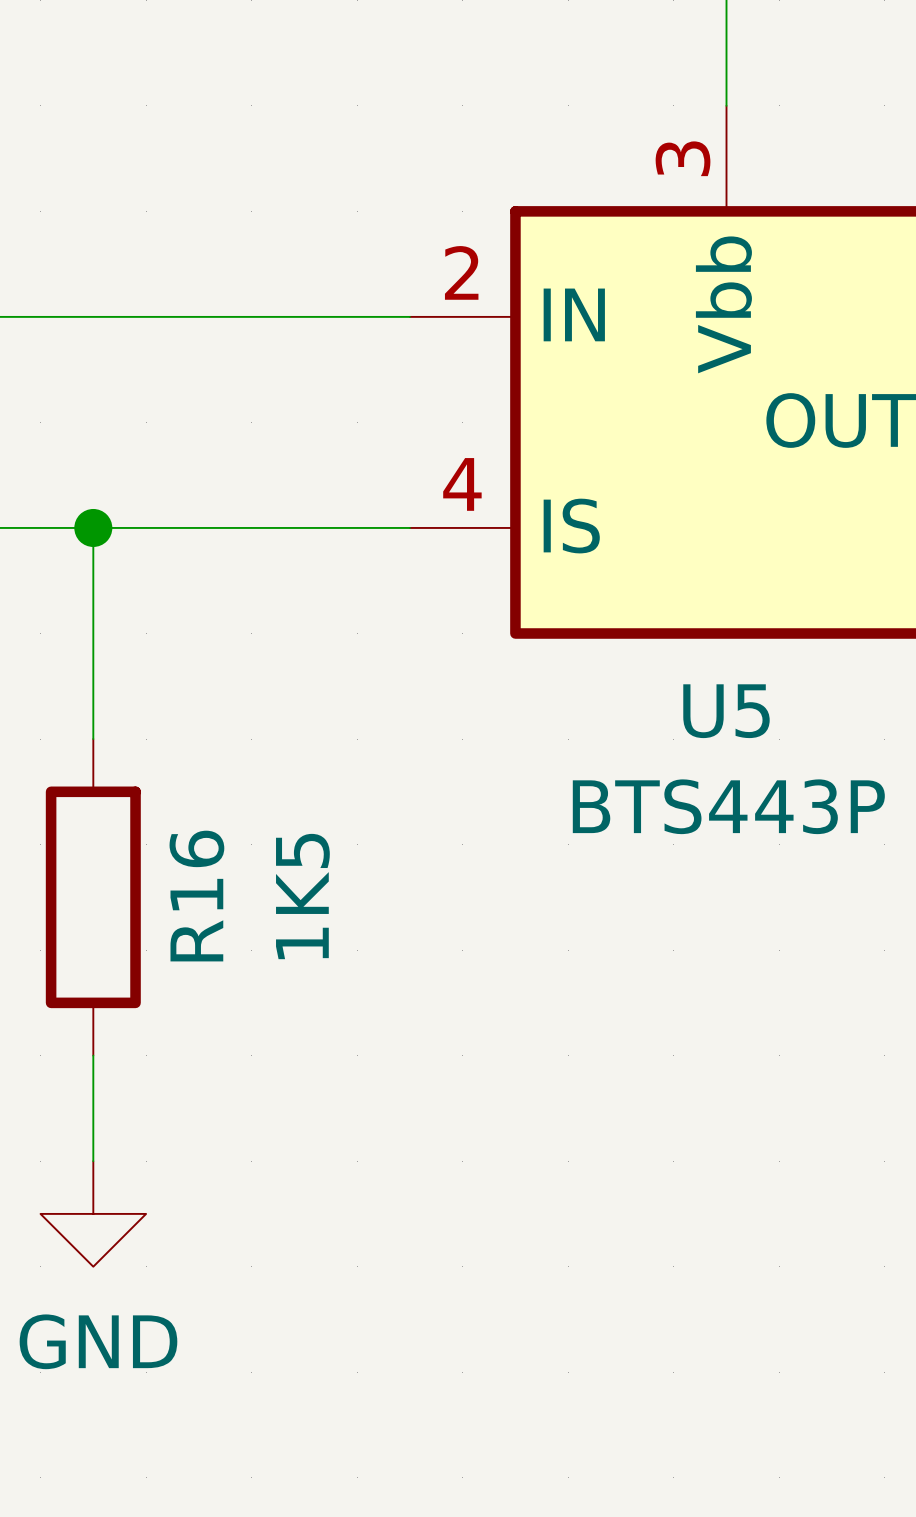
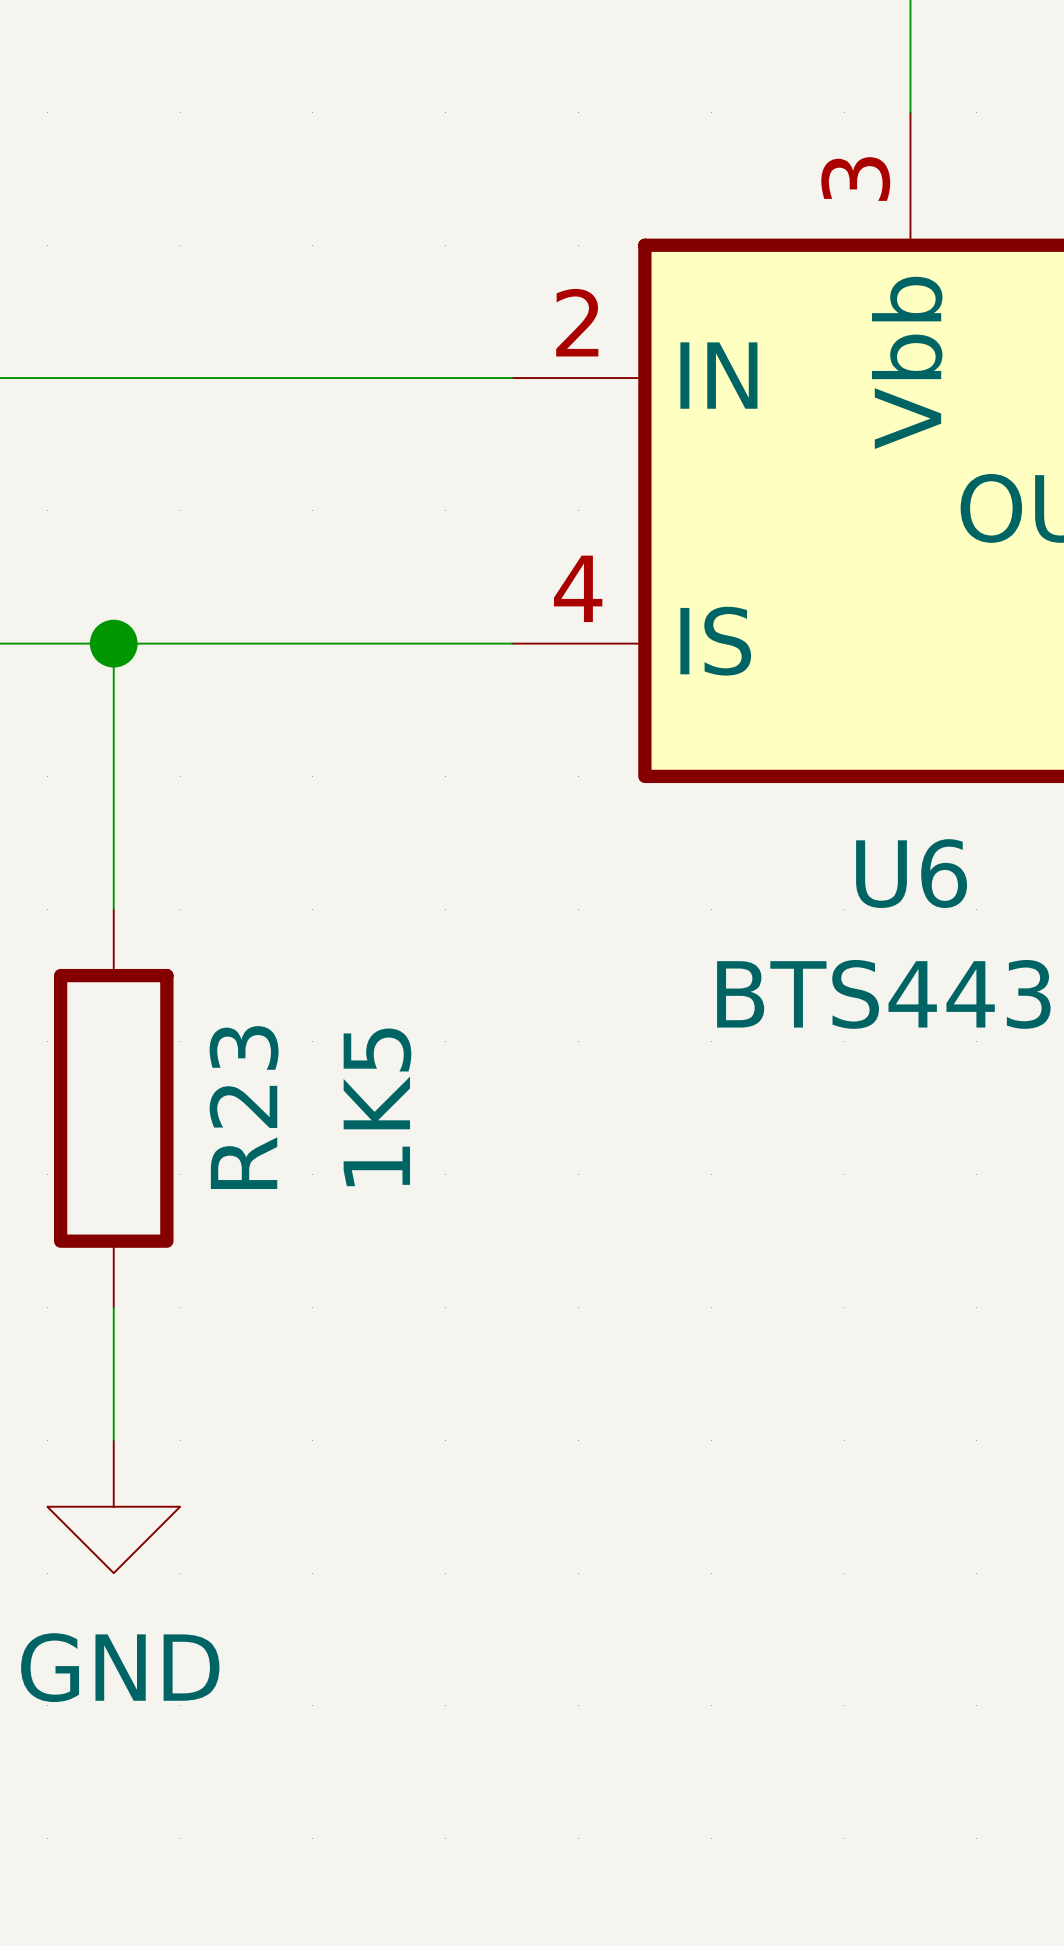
U5 name: U5 (726, 711) -> U6 (911, 873)
R16 name: R16 (196, 896) -> R23 (244, 1107)

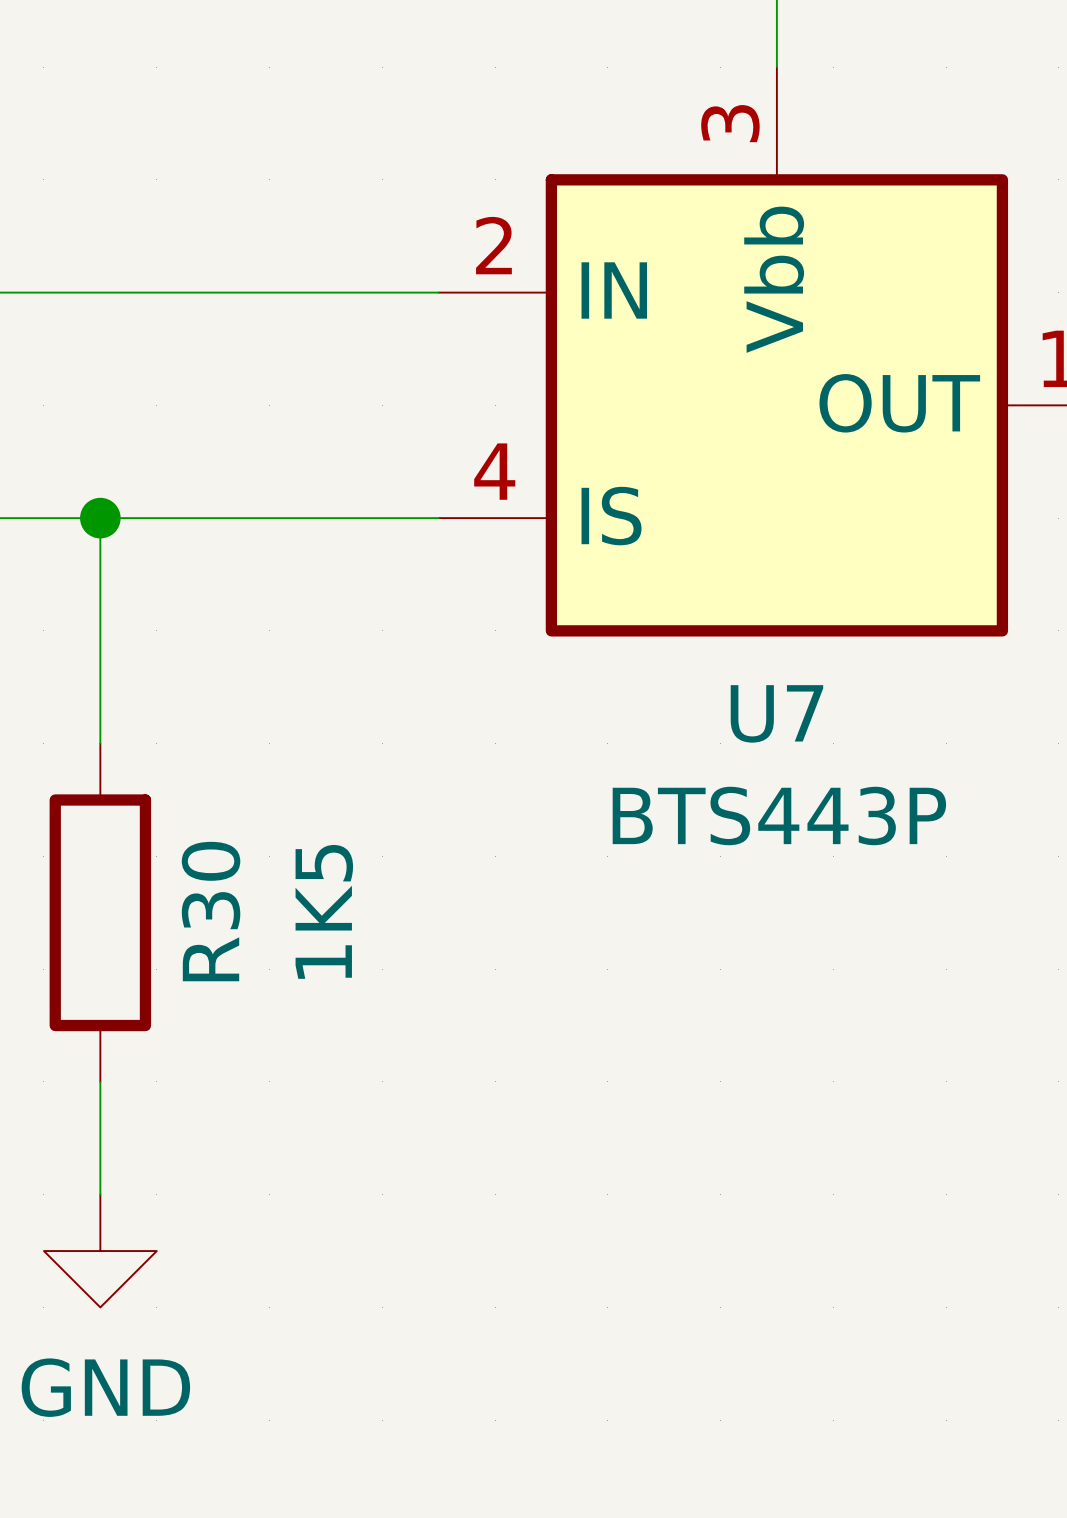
U6 name: U6 (911, 873) -> U7 (776, 713)
R23 name: R23 (244, 1107) -> R30 (211, 911)

